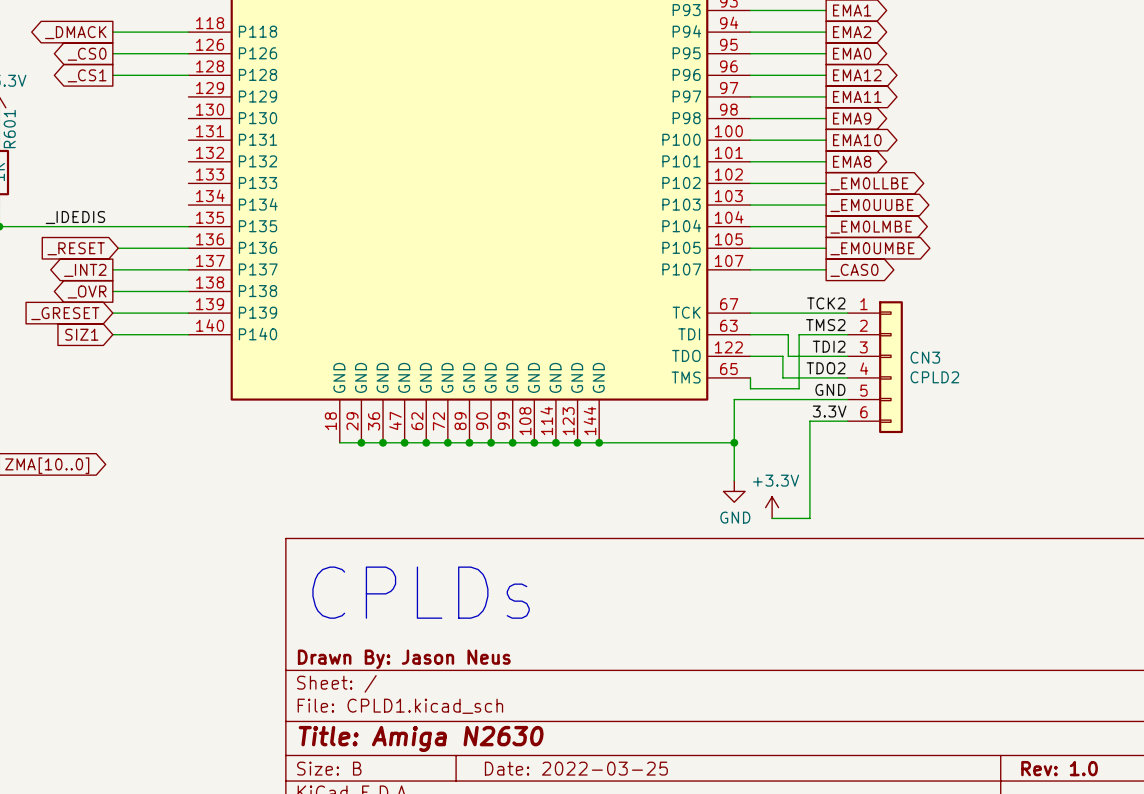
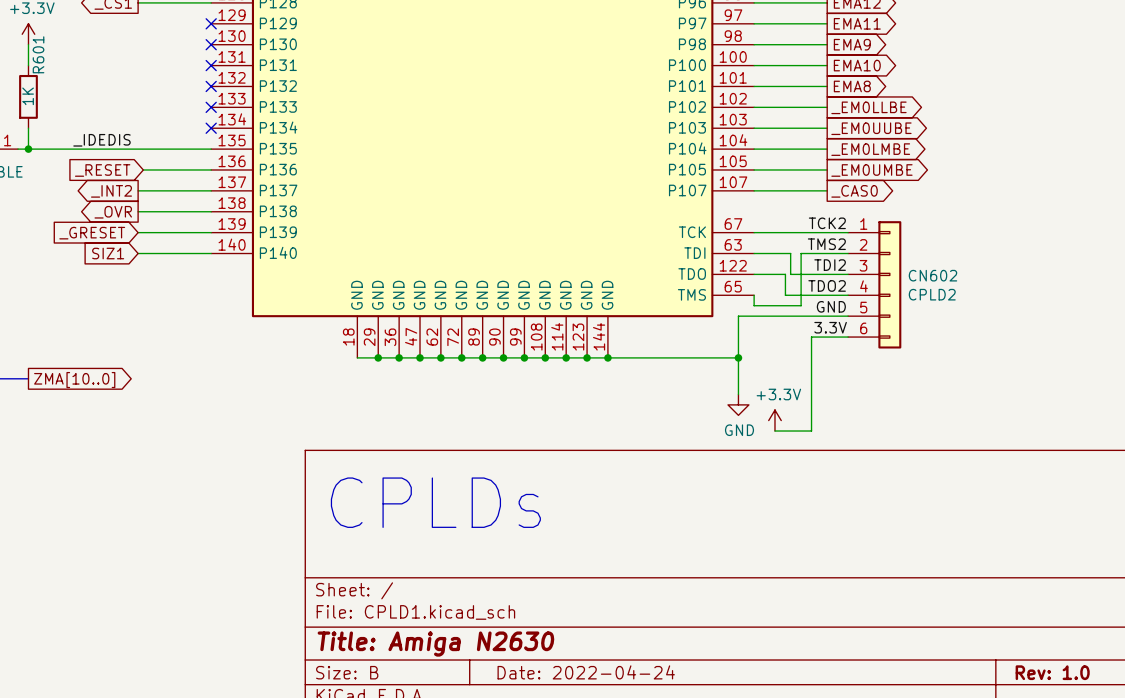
no-connect mark: none -> (211, 23)
no-connect mark: none -> (211, 44)
no-connect mark: none -> (211, 65)
no-connect mark: none -> (211, 86)
no-connect mark: none -> (211, 107)
no-connect mark: none -> (211, 128)
CN3 name: CN3 (925, 357) -> CN602 (932, 275)
title block: Drawn By: Jason Neus (404, 659) -> none
title block: Date: 2022-03-25 (576, 768) -> Date: 2022-04-24 (586, 672)

